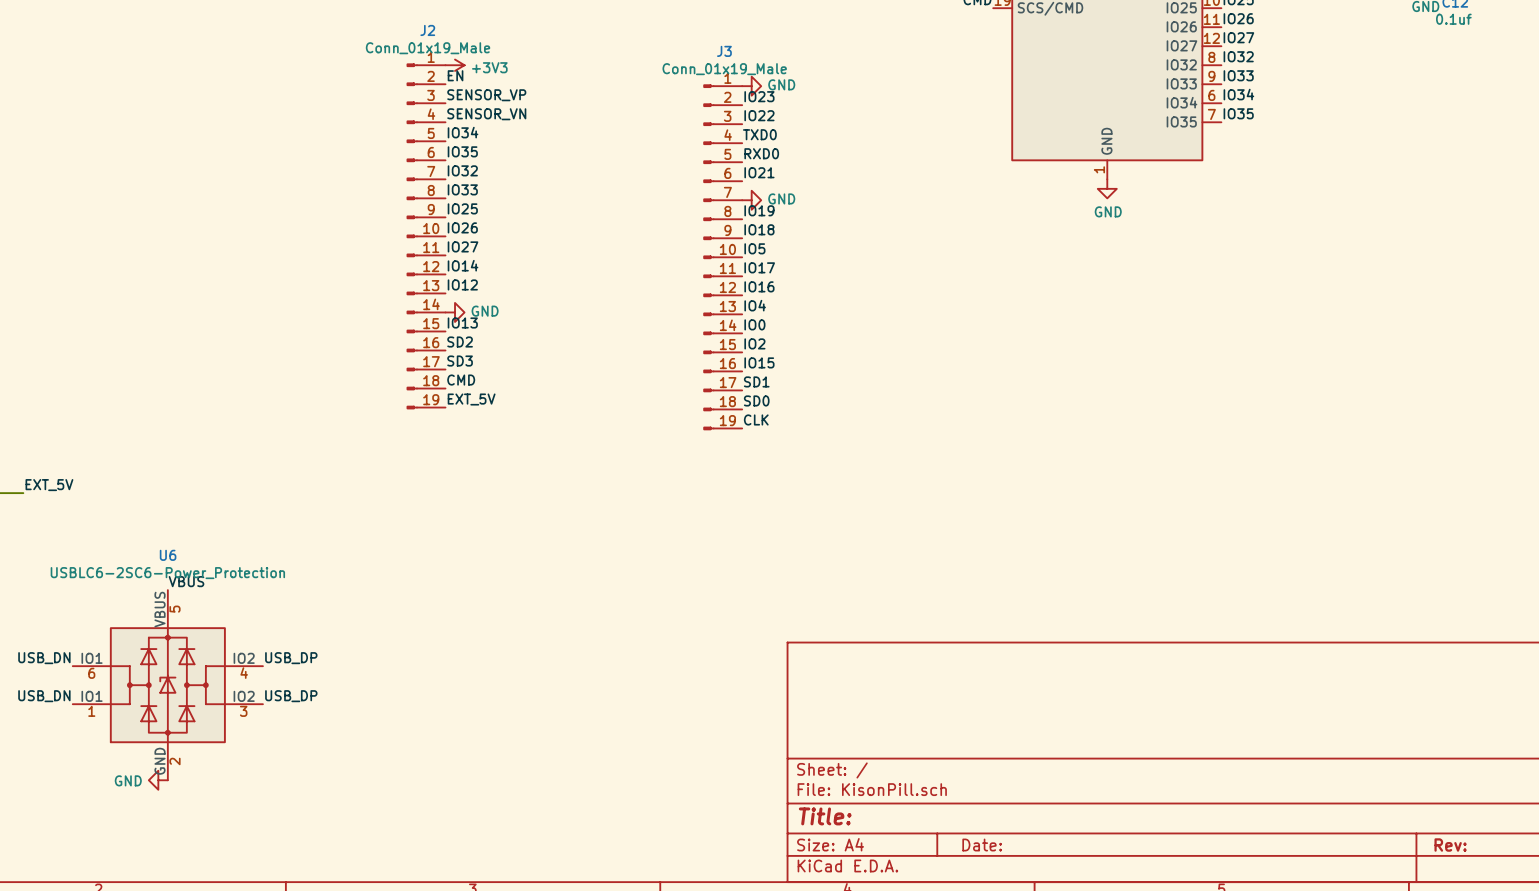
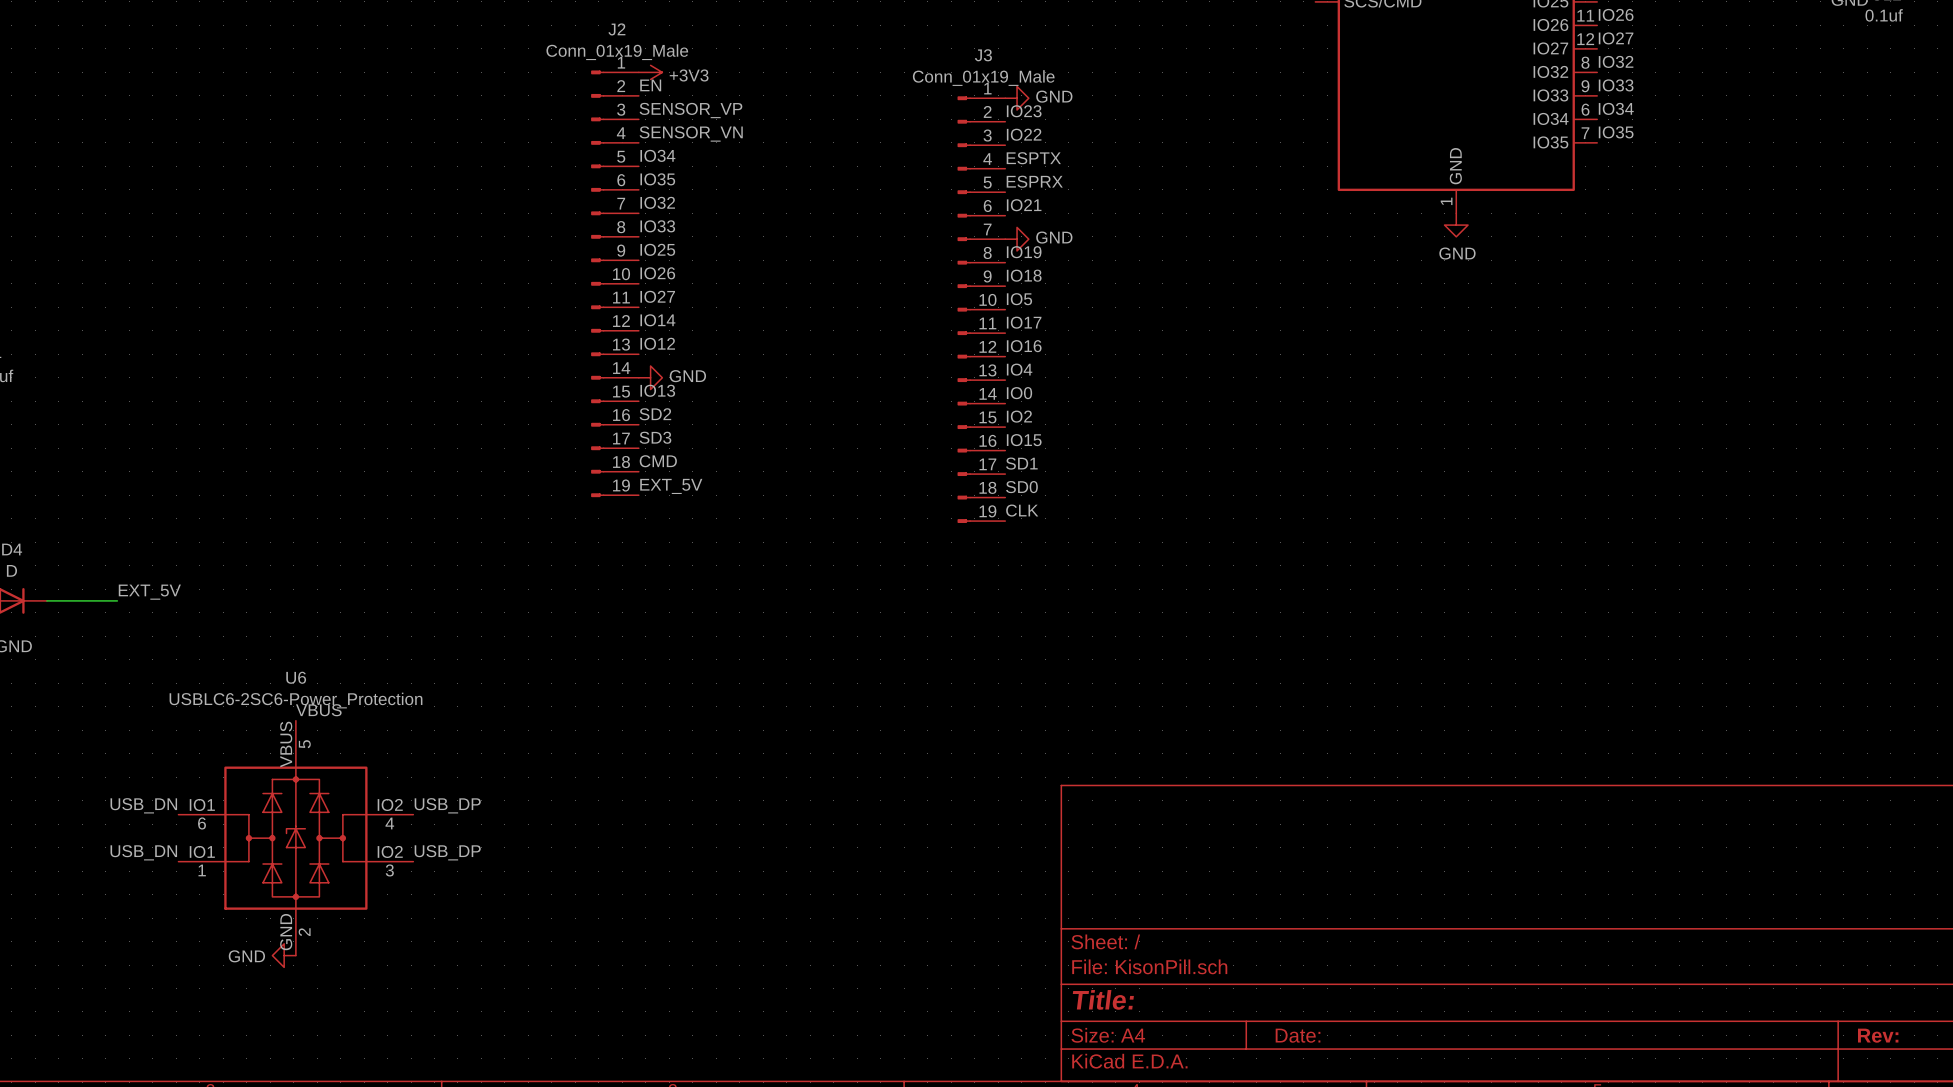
label: TXD0 (759, 134) -> ESPTX (1033, 158)
label: RXD0 (761, 153) -> ESPRX (1034, 181)

